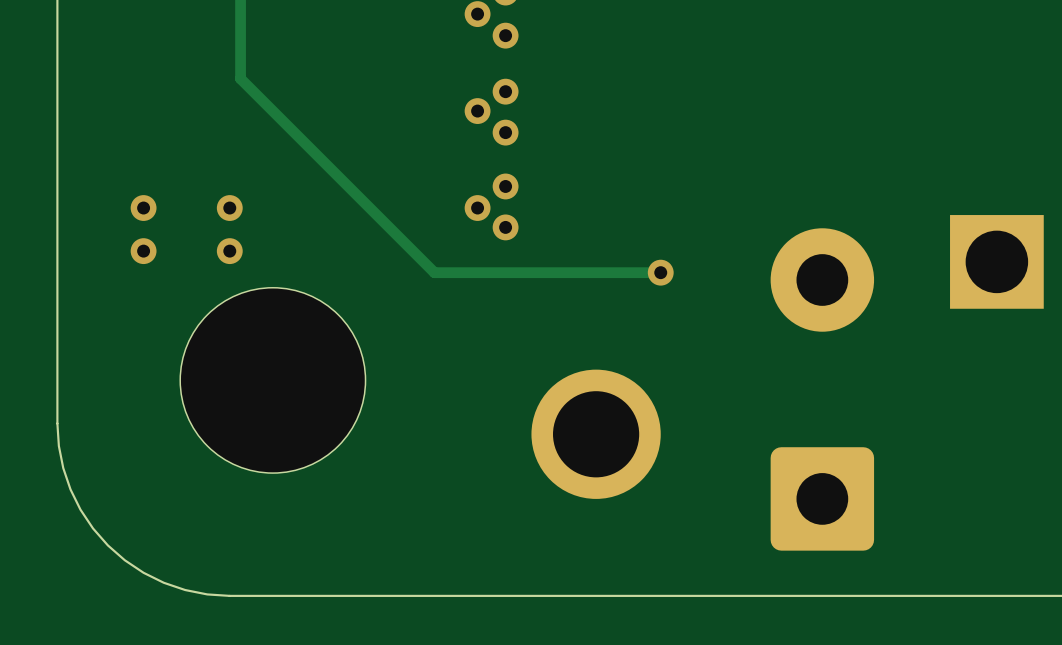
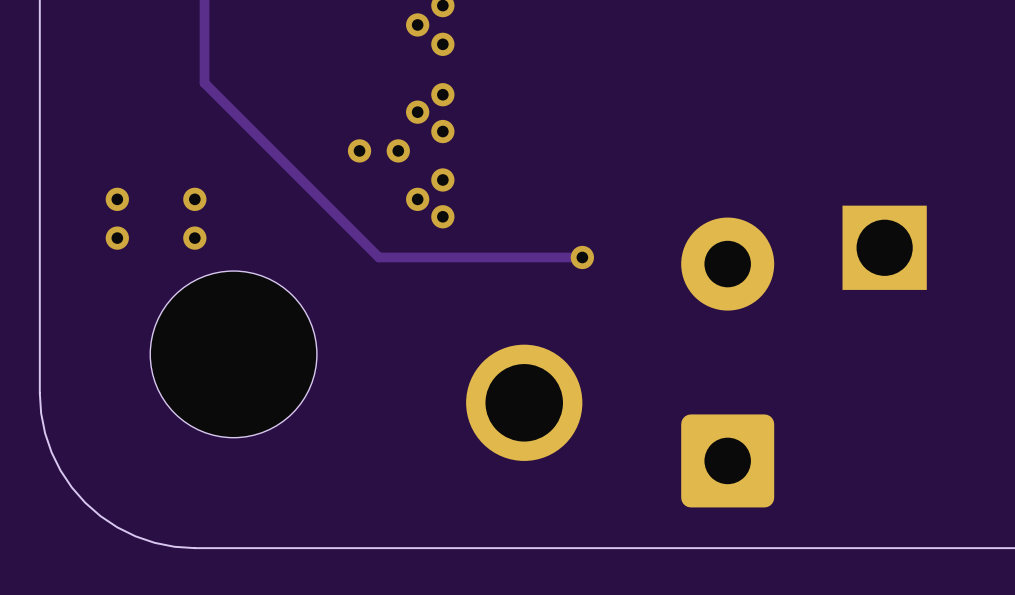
via: none -> (359, 150)
via: none -> (398, 150)

